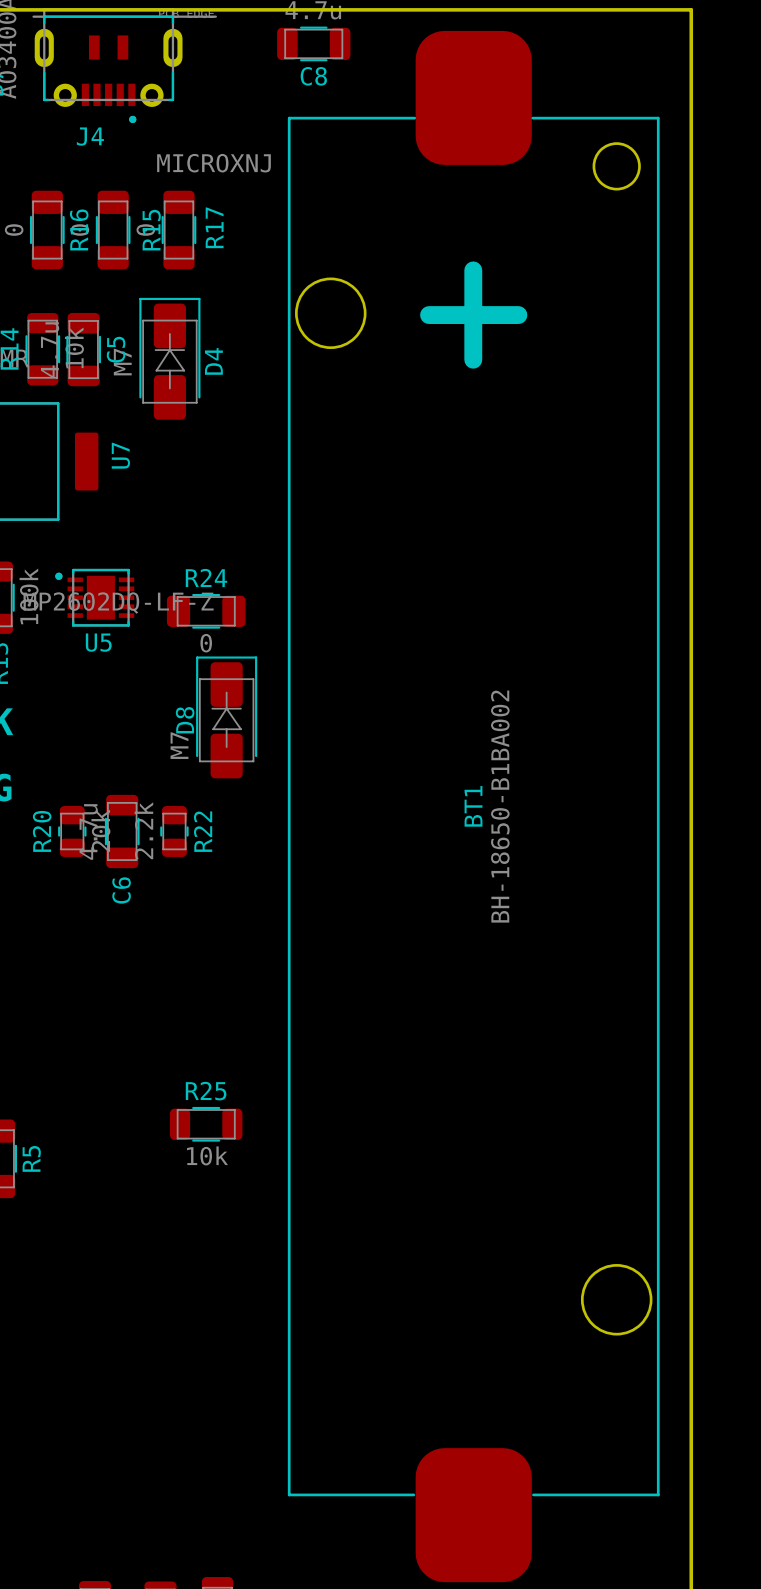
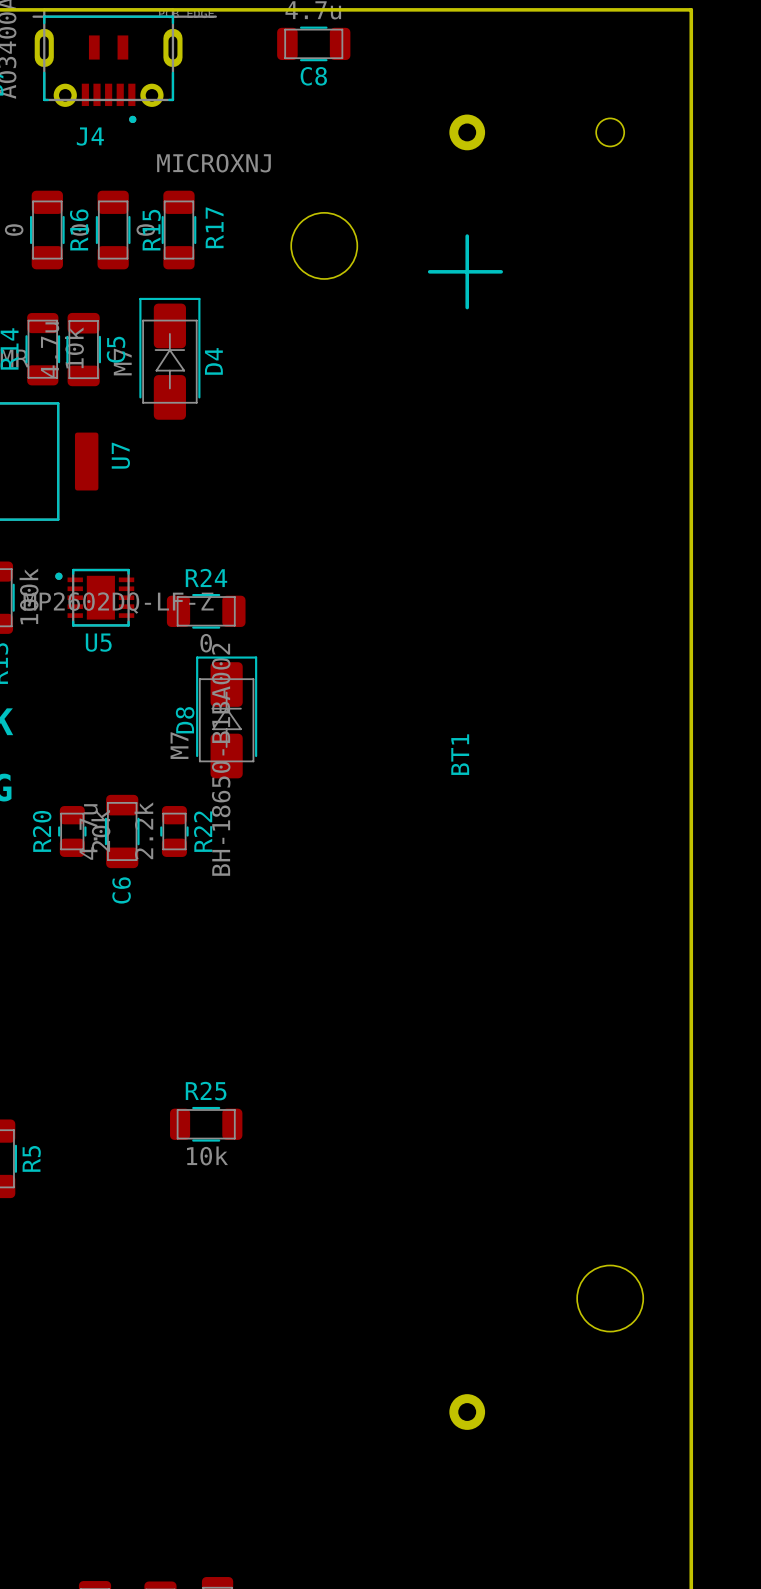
BT1 footprint: [287, 30, 660, 1583] -> [291, 114, 644, 1430]
BT1 value position: BH-18650-B1BA002 (500, 806) -> BH-18650-B1BA002 (221, 759)

